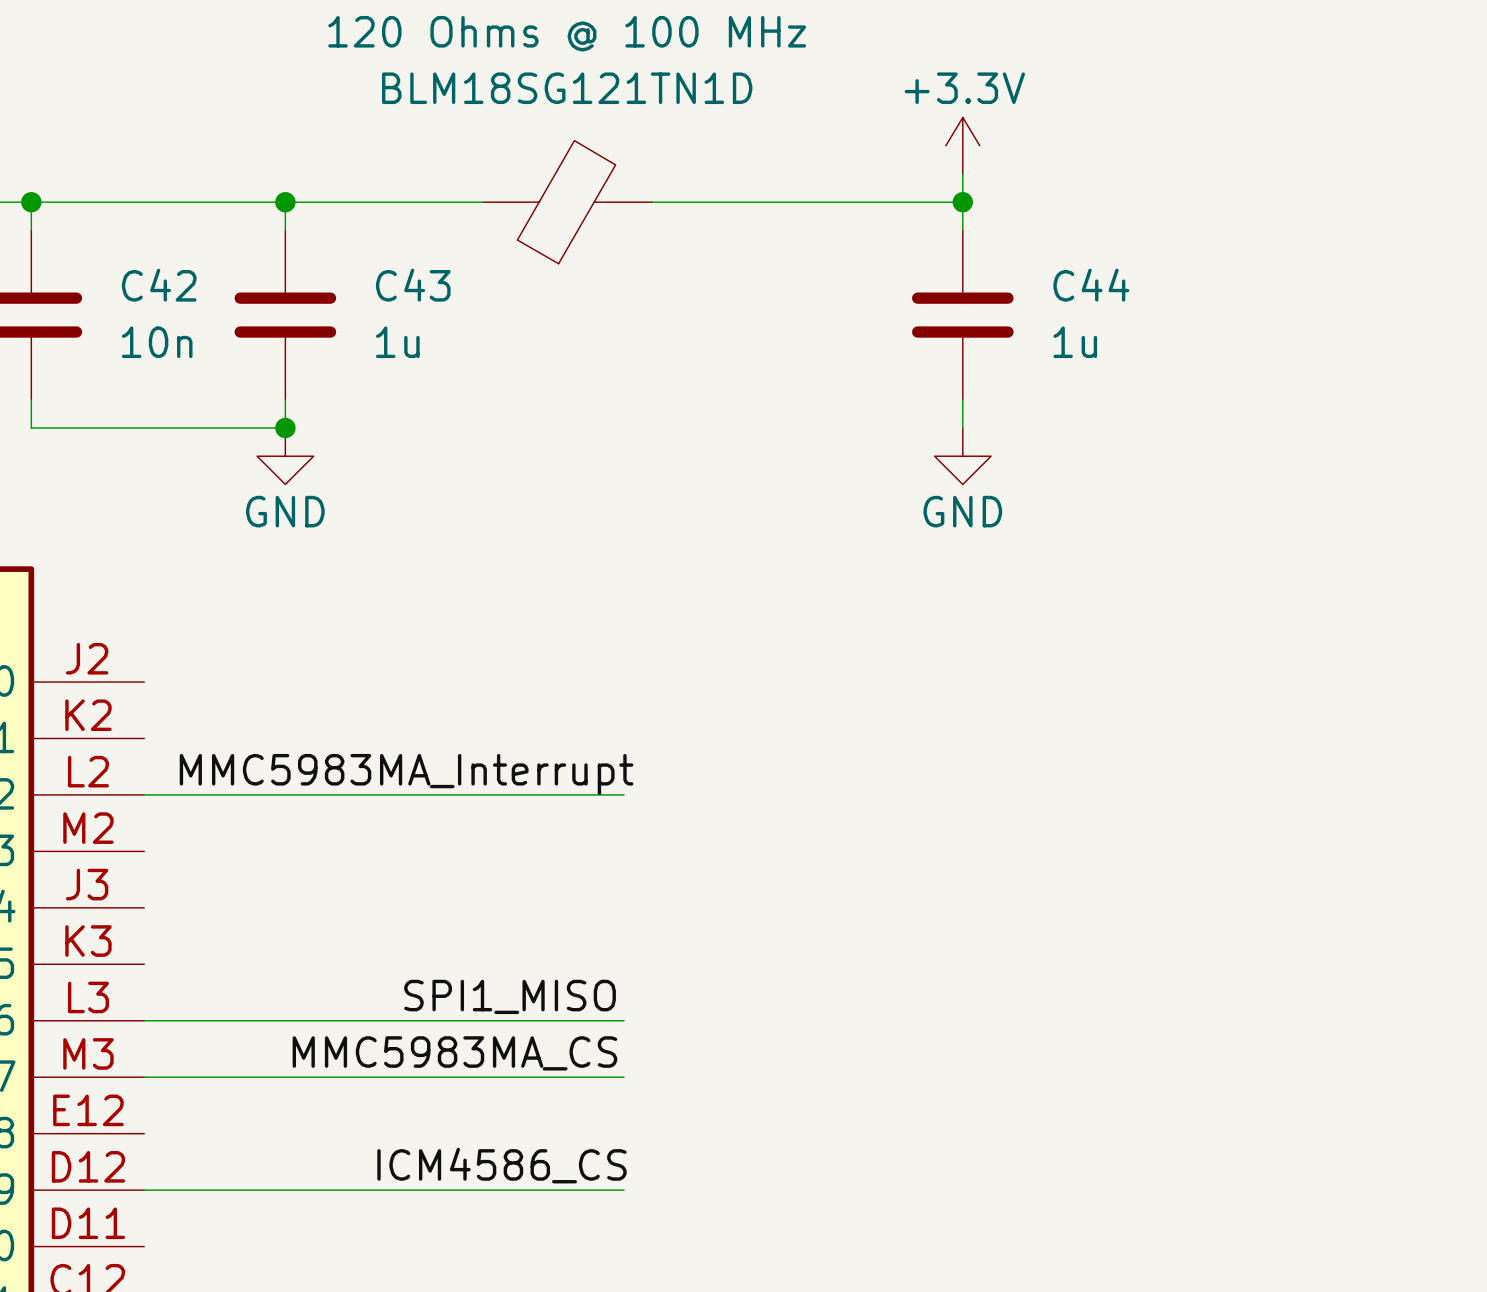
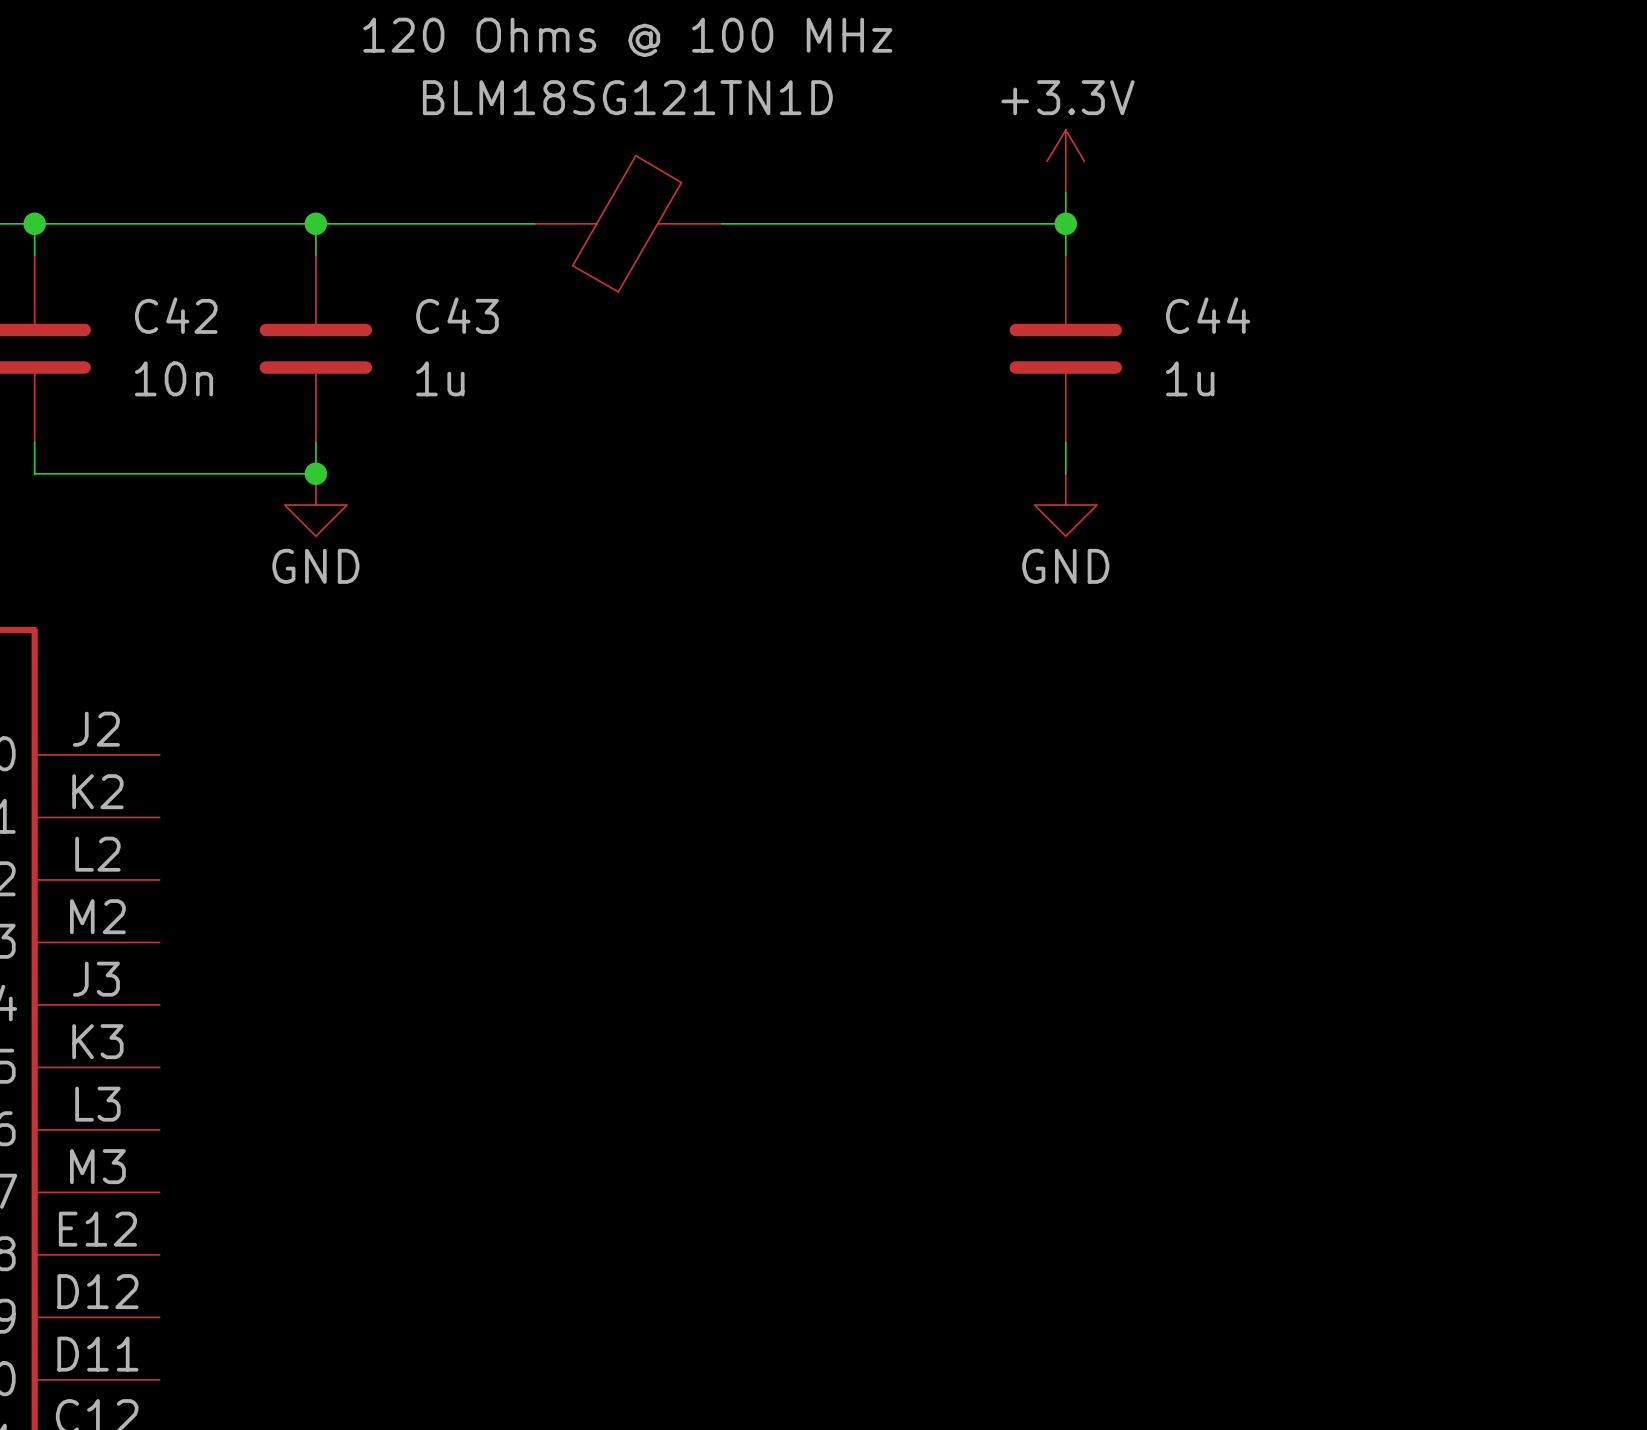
label: MMC5983MA_Interrupt (406, 774) -> none
wire: (144, 794) (624, 794) -> none
label: SPI1_MISO (510, 996) -> none
wire: (144, 1020) (624, 1020) -> none
label: MMC5983MA_CS (454, 1053) -> none
wire: (144, 1077) (624, 1077) -> none
label: ICM4586_CS (501, 1165) -> none
wire: (144, 1190) (624, 1190) -> none

